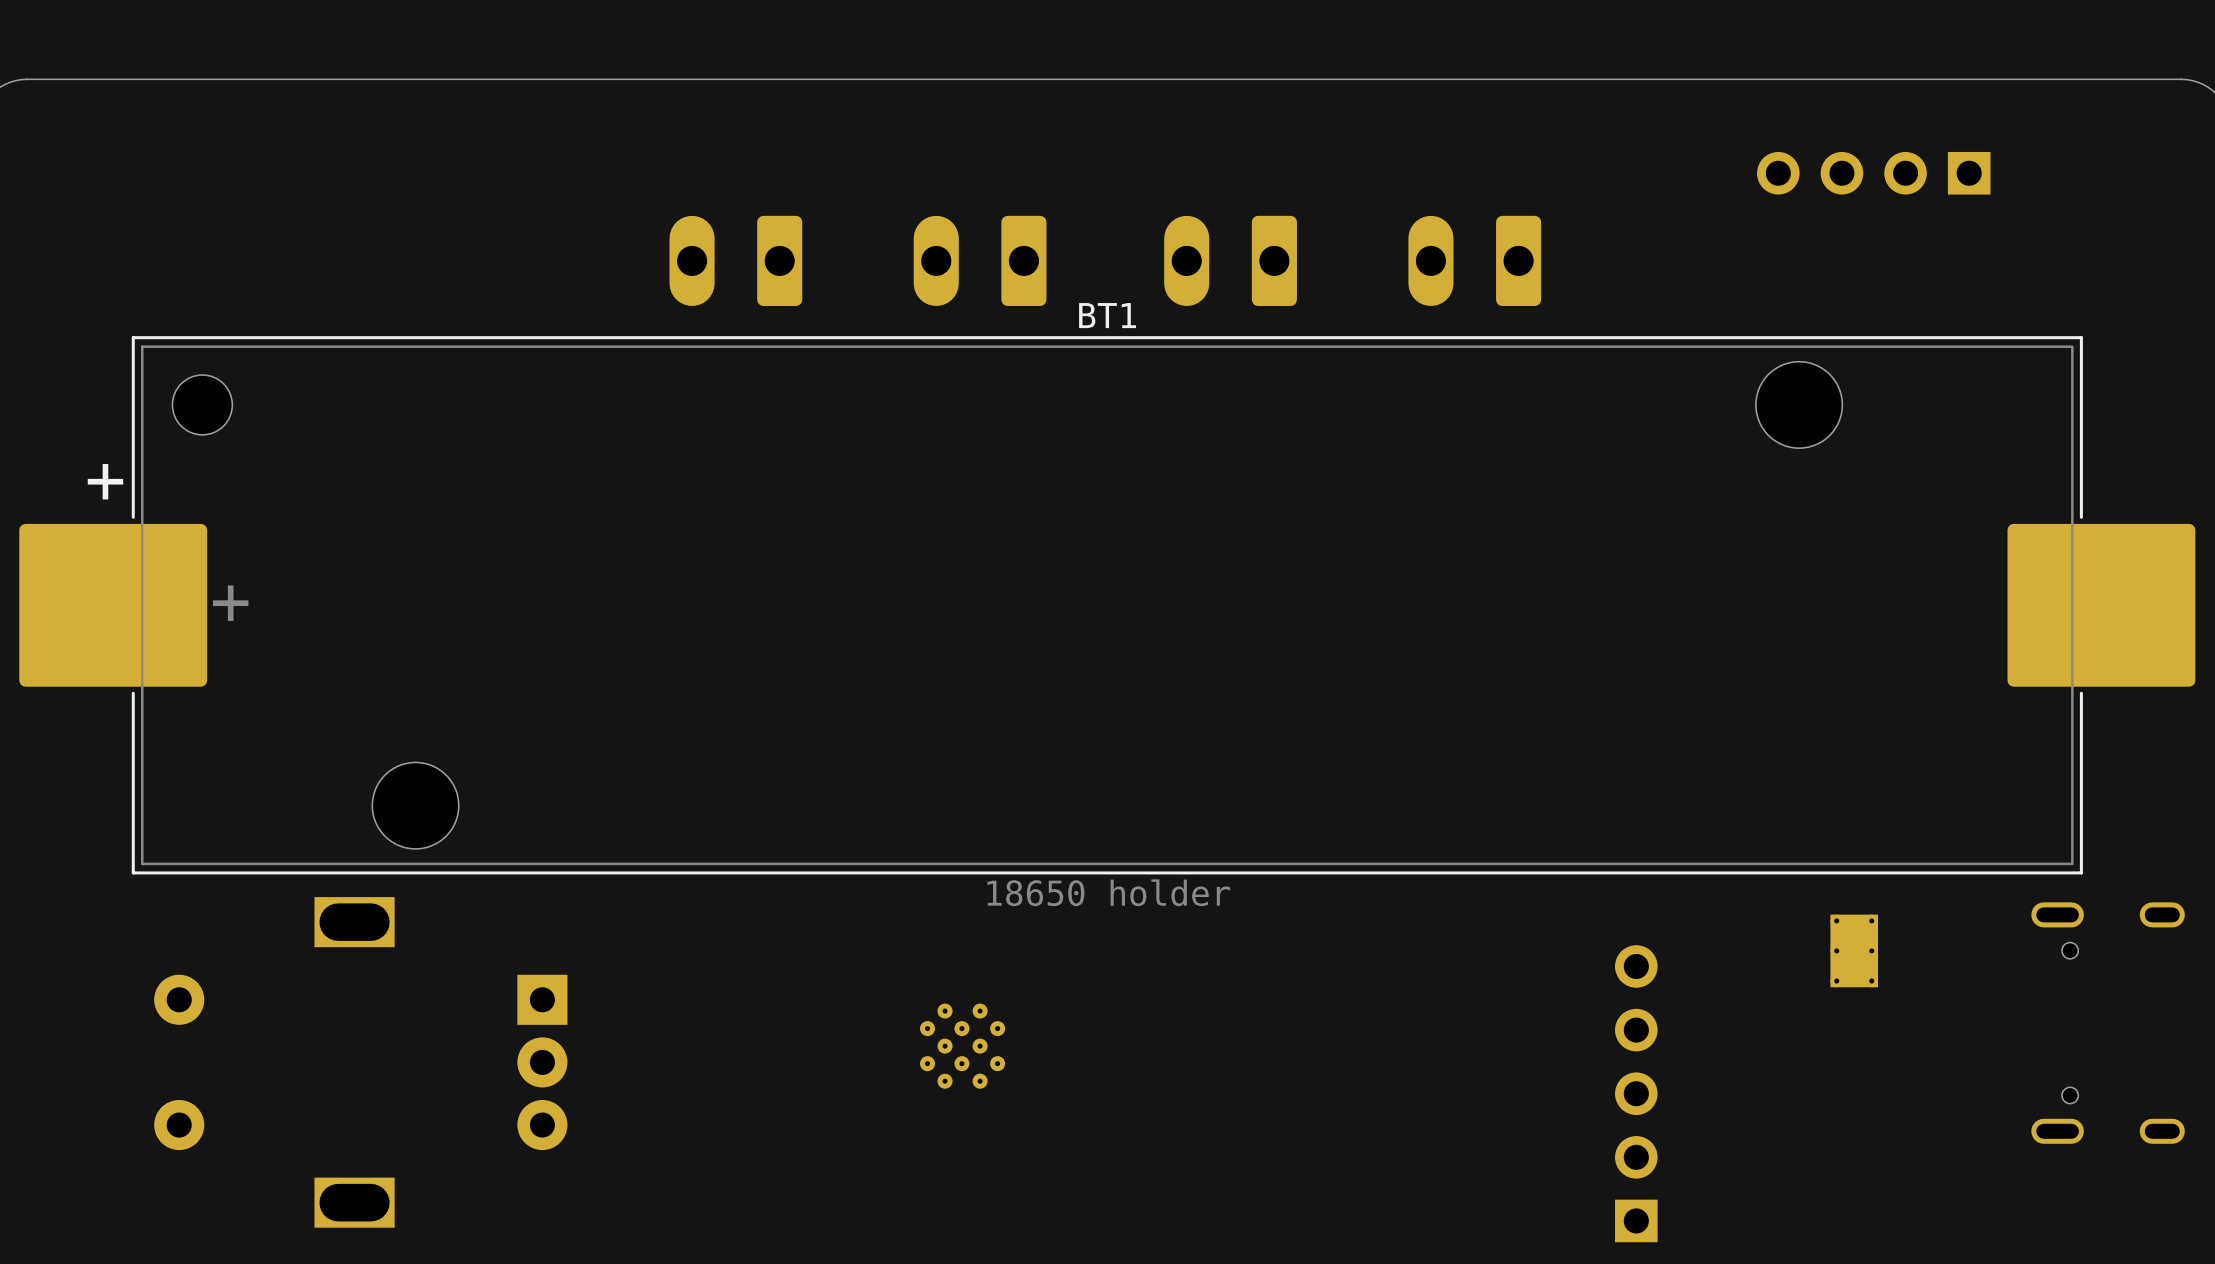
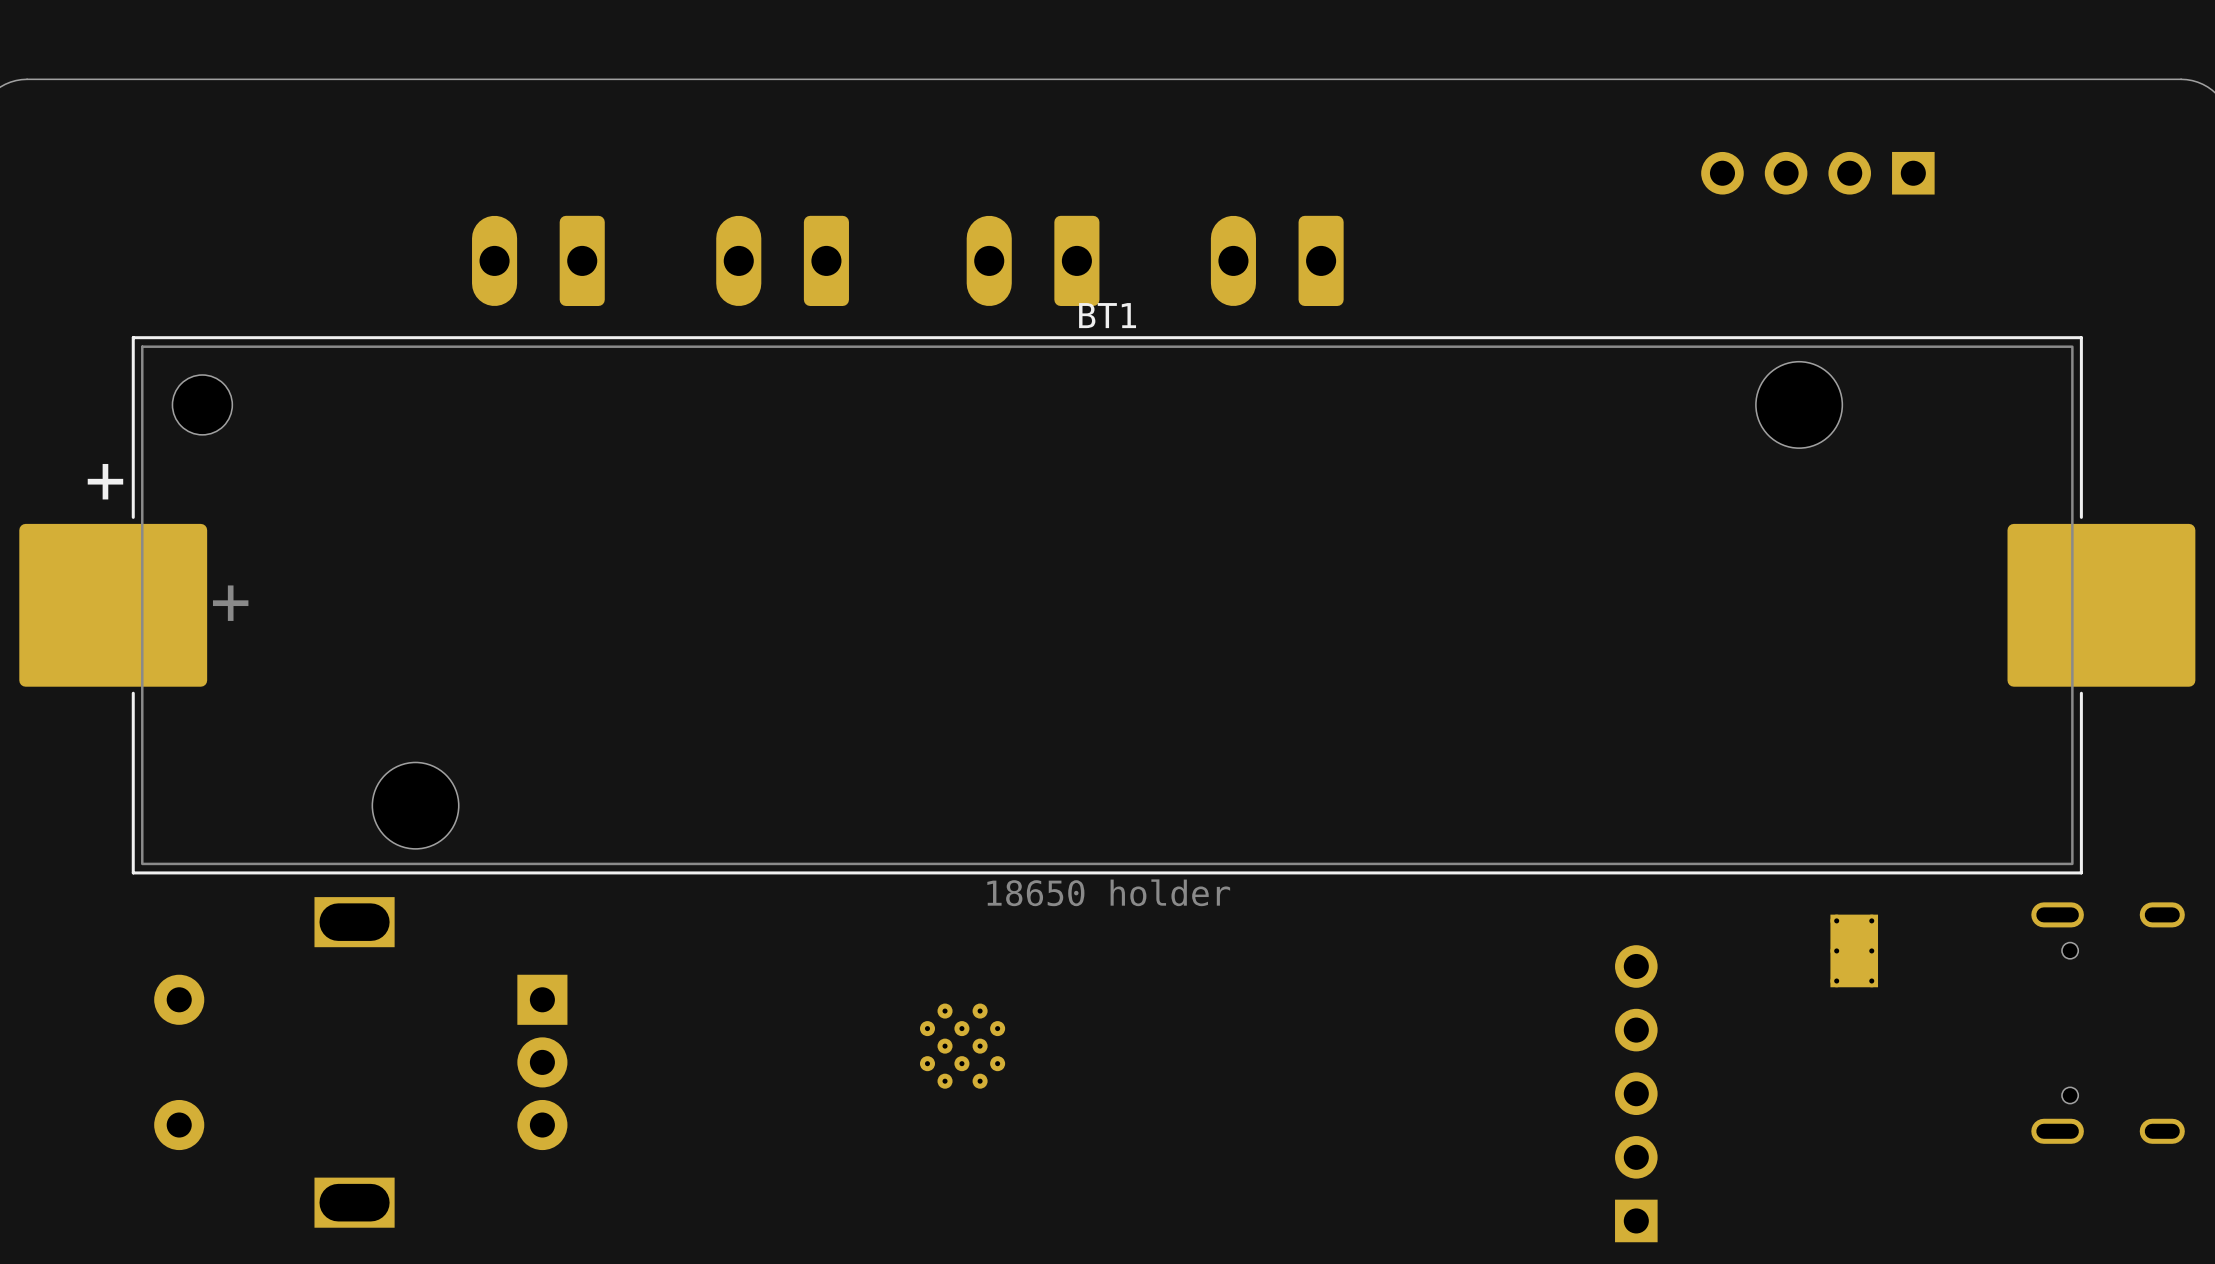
part position: (1873, 173) -> (1817, 173)
part: none -> (538, 260)
part position: (735, 260) -> (782, 260)
part position: (980, 260) -> (1033, 260)
part position: (1230, 260) -> (1277, 260)
part: (1474, 260) -> none

